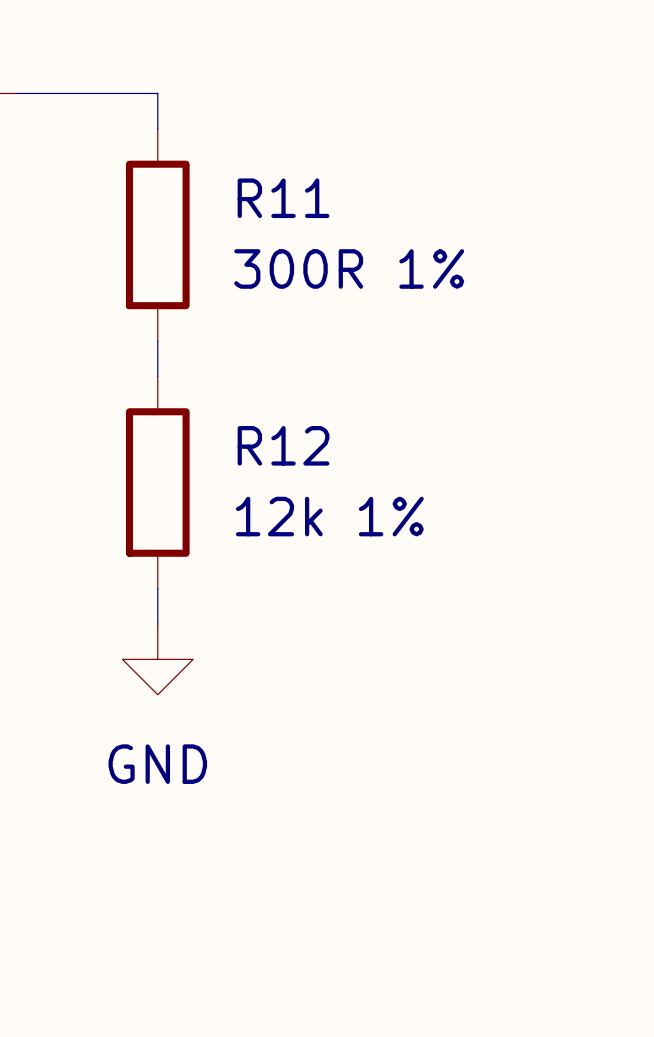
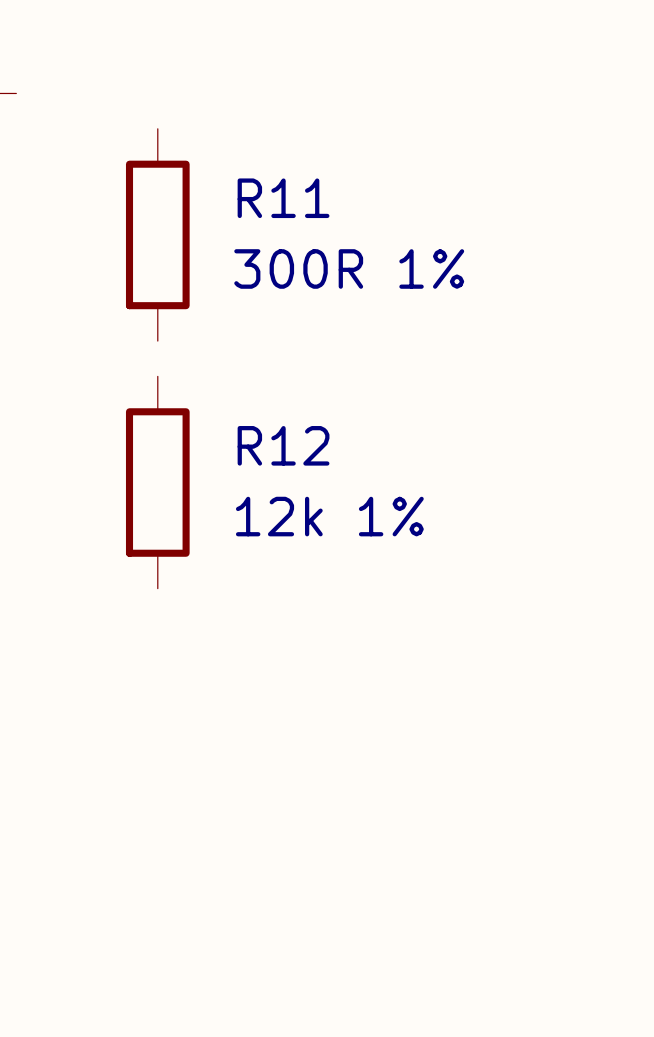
wire: (16, 93) (157, 93) (157, 128) -> none
wire: (157, 341) (157, 376) -> none
wire: (157, 588) (157, 623) -> none
power symbol: GND (157, 659) -> none

